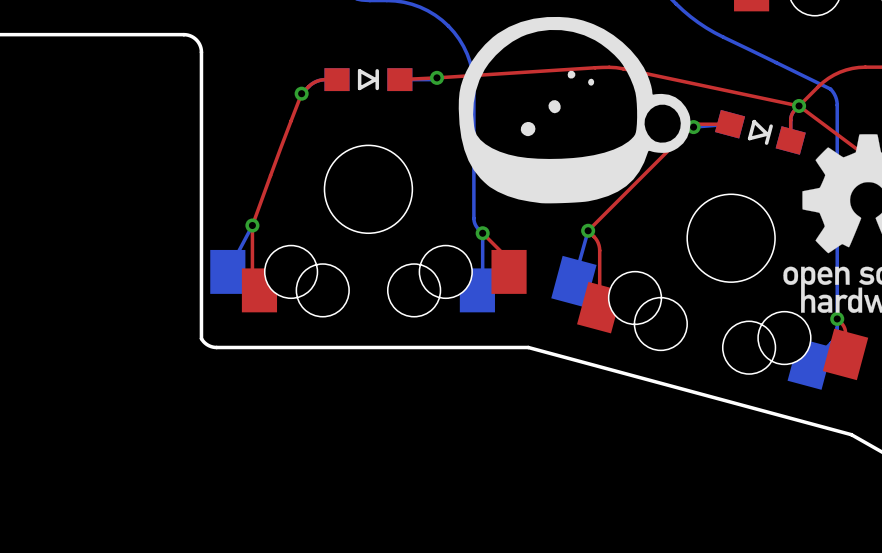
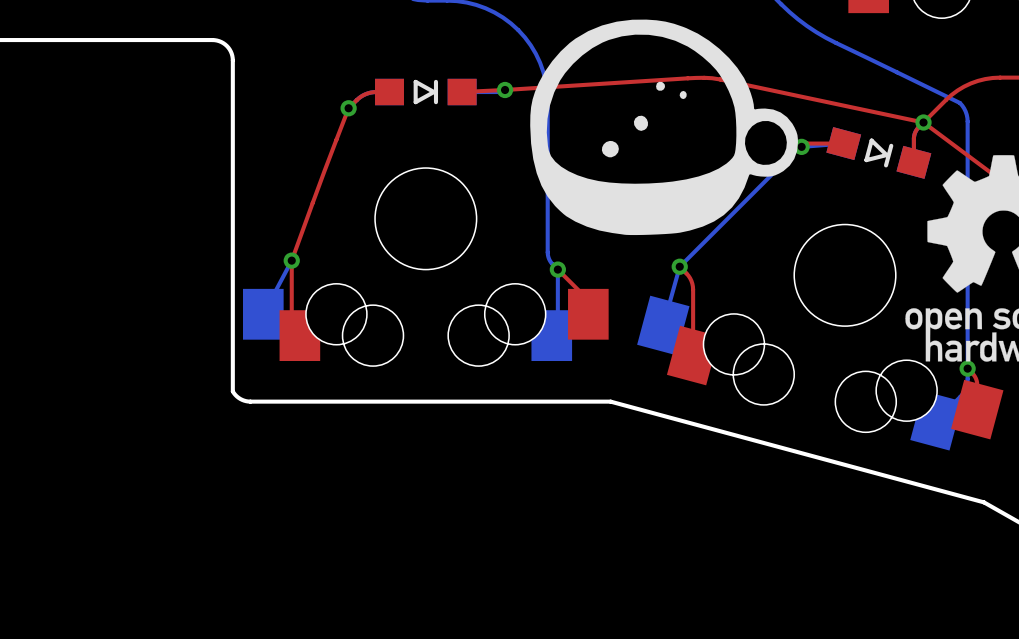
top track: (693, 127) (588, 230) -> none
bottom track: none -> (801, 146) (679, 266)

